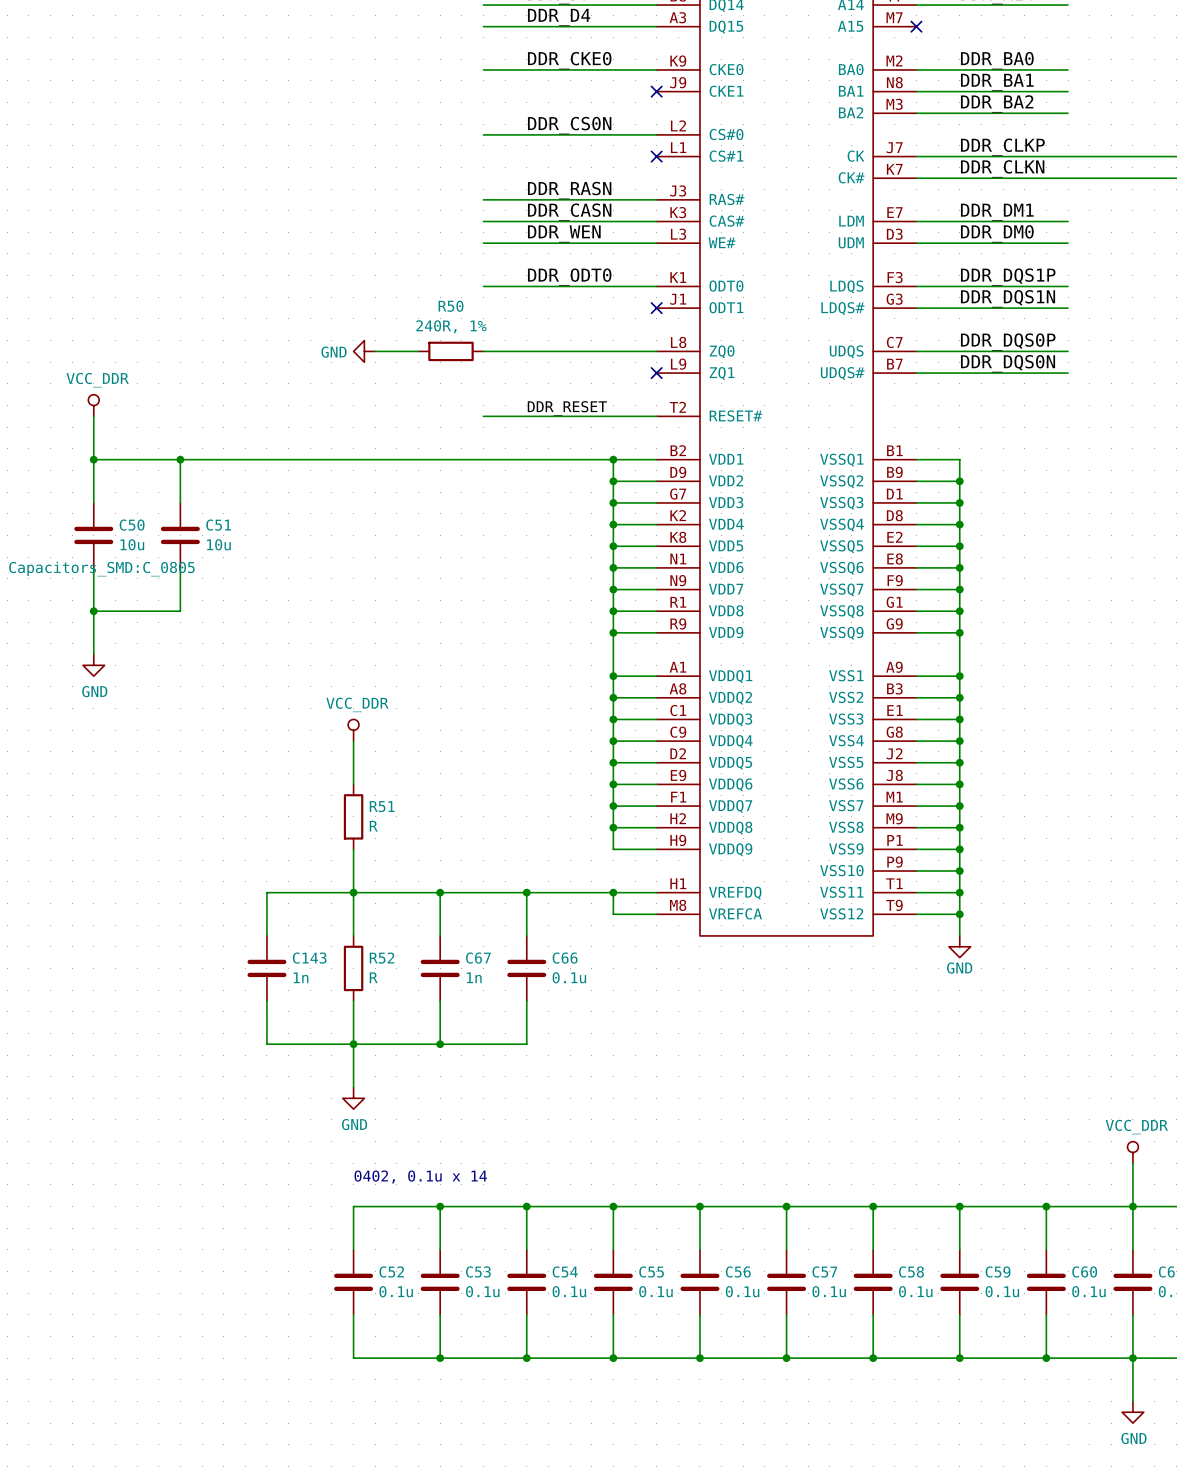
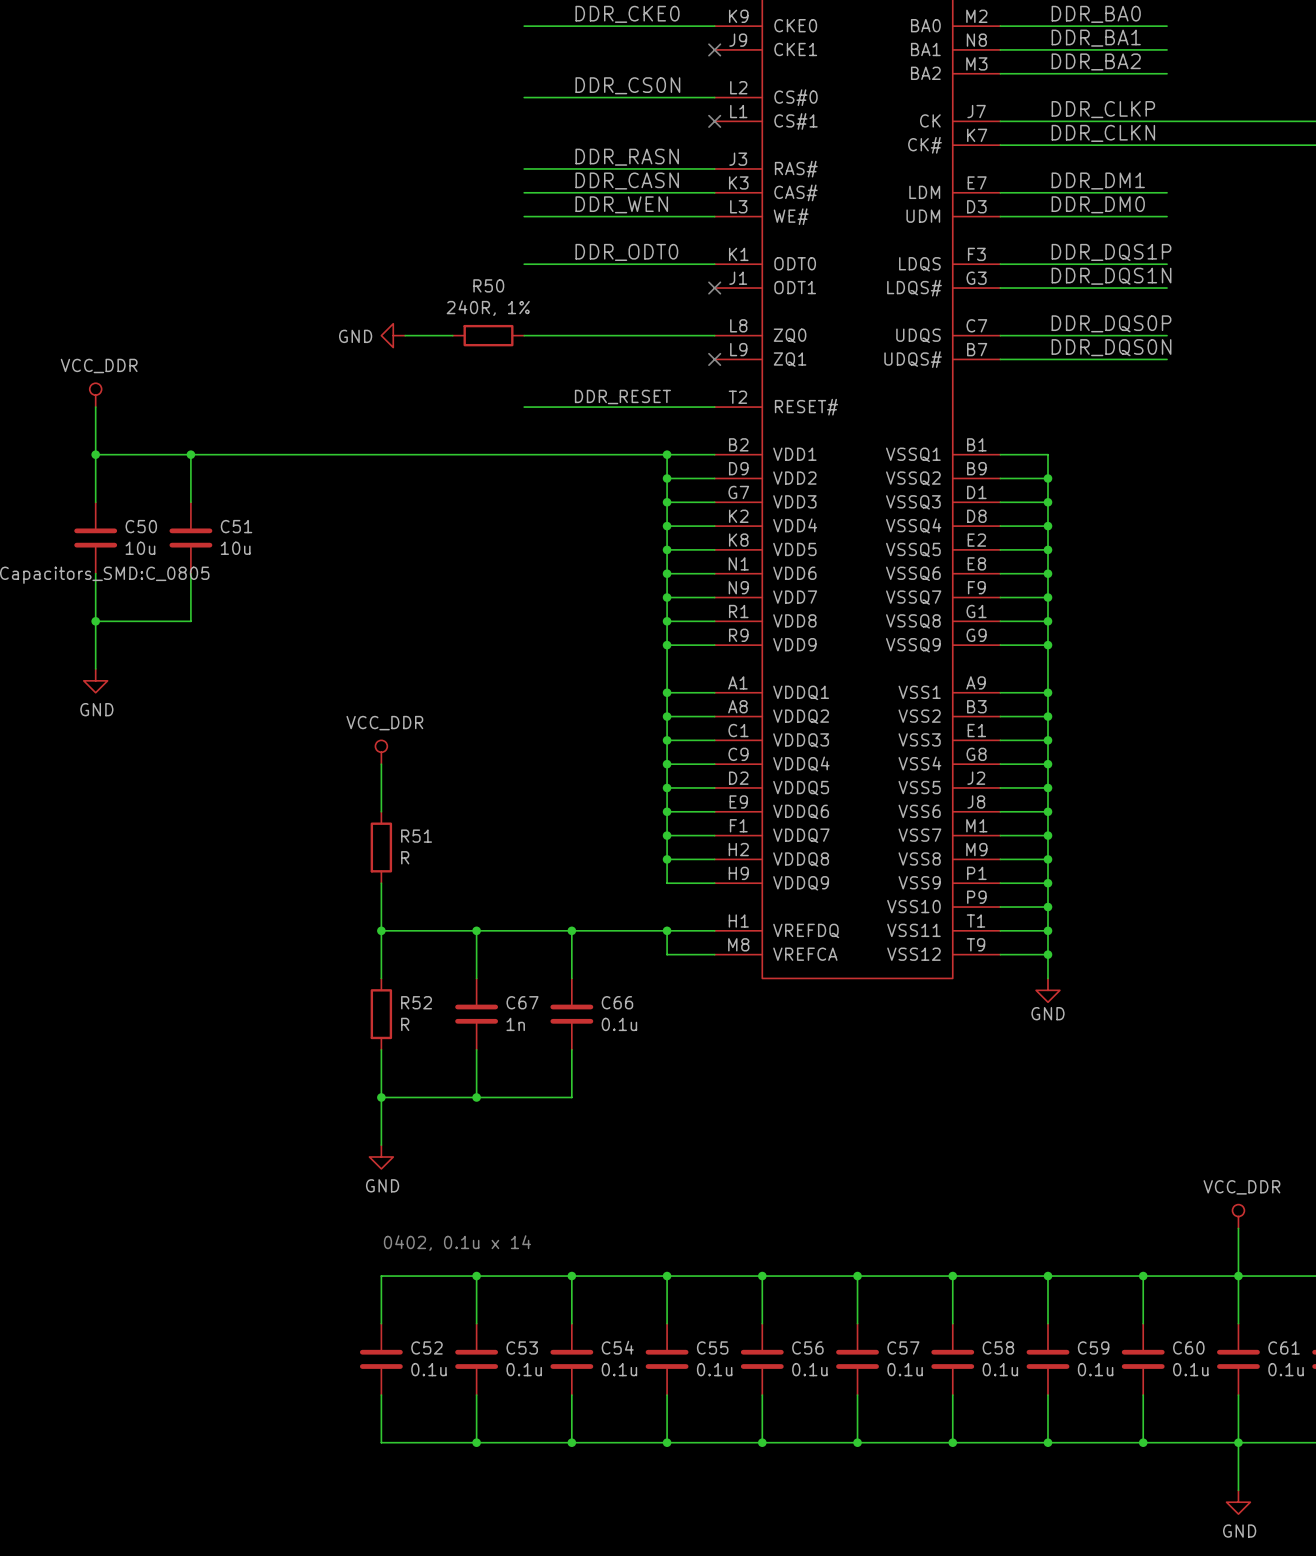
wire: (353, 892) (266, 892) (266, 935) -> none
C143: 1n (266, 968) -> none
wire: (266, 1000) (266, 1044) (353, 1044) -> none

